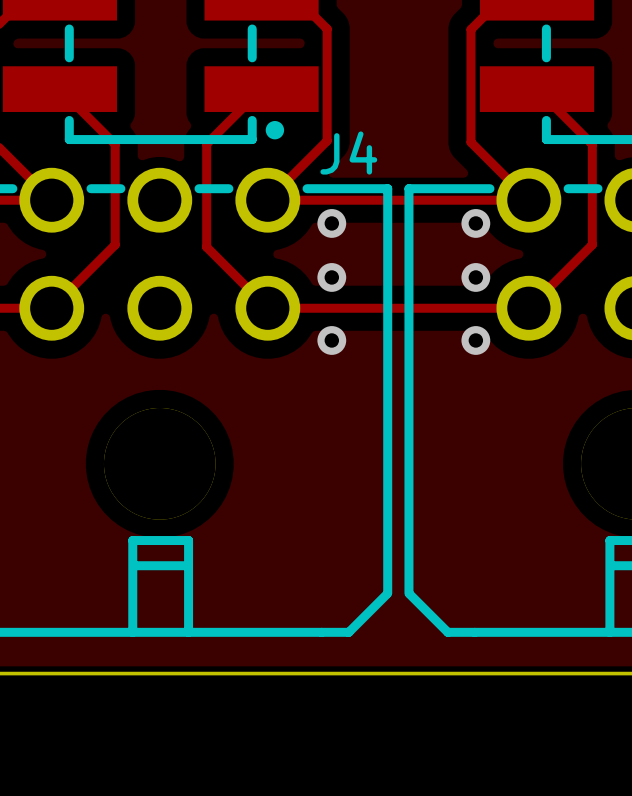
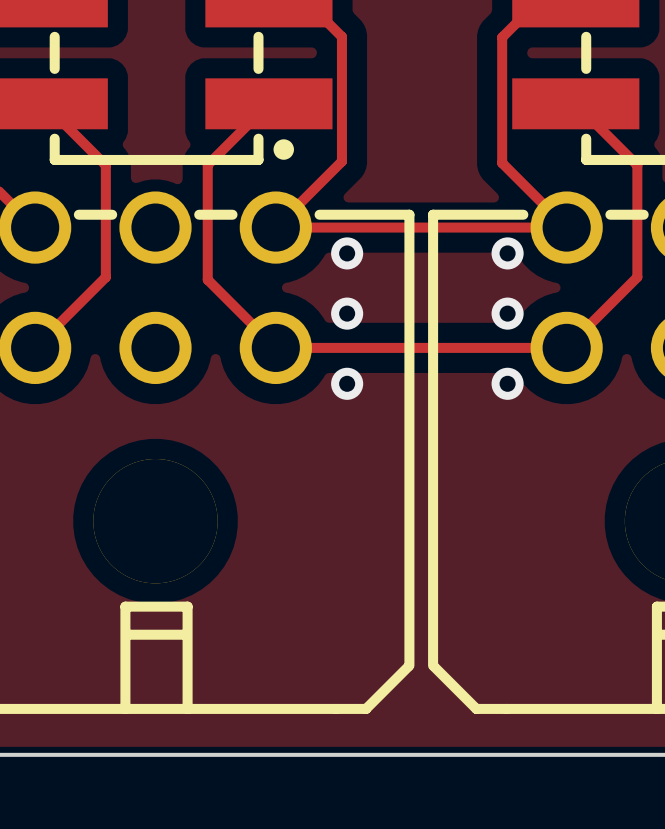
J4 name: J4 (348, 153) -> none

